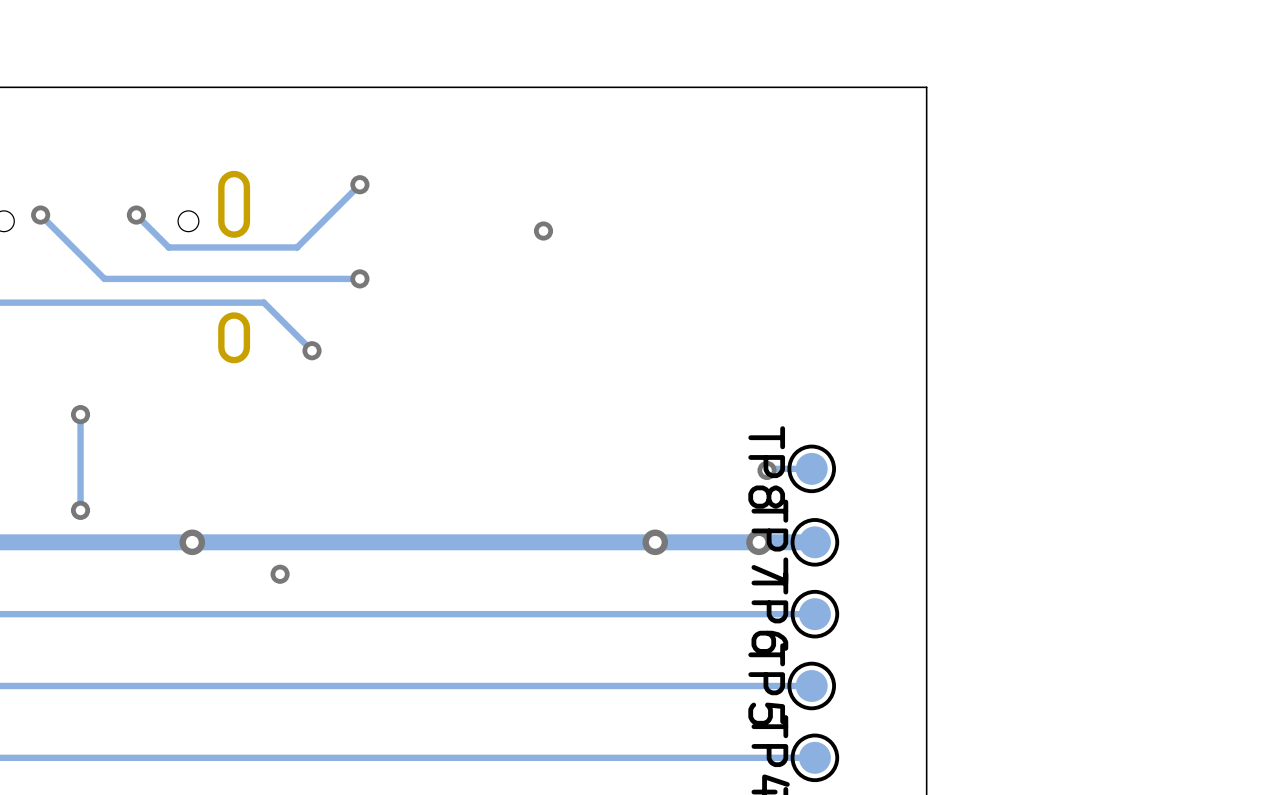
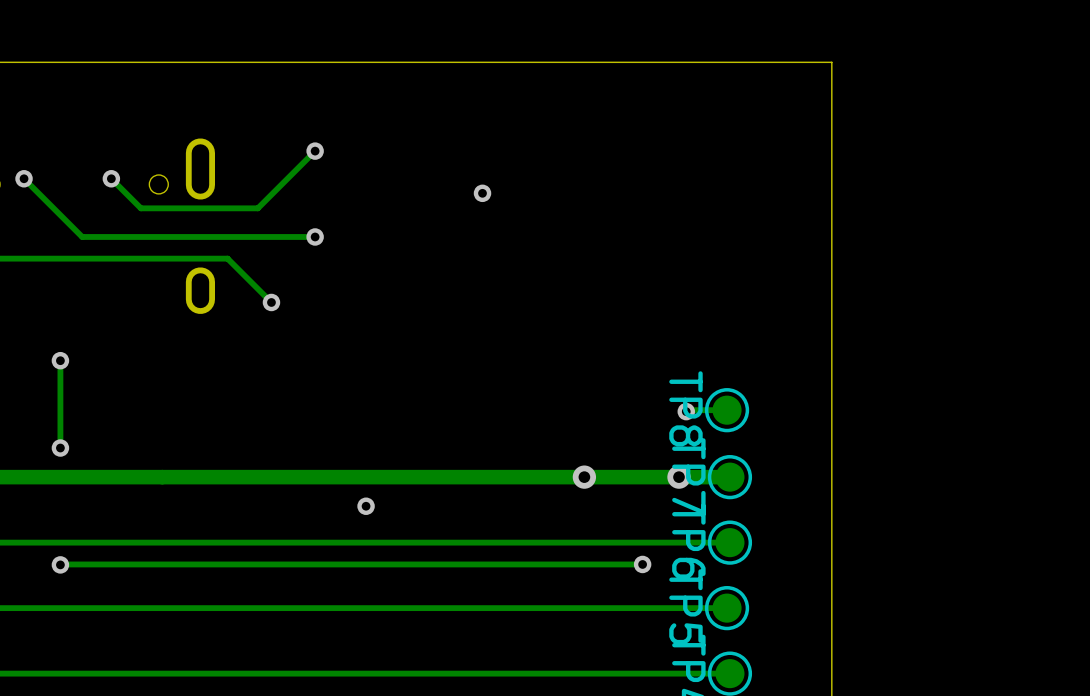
via: (192, 542) -> none
via: (280, 574) -> none
via: none -> (366, 506)
via: none -> (60, 564)
track: none -> (642, 564) (60, 564)
via: none -> (642, 564)

